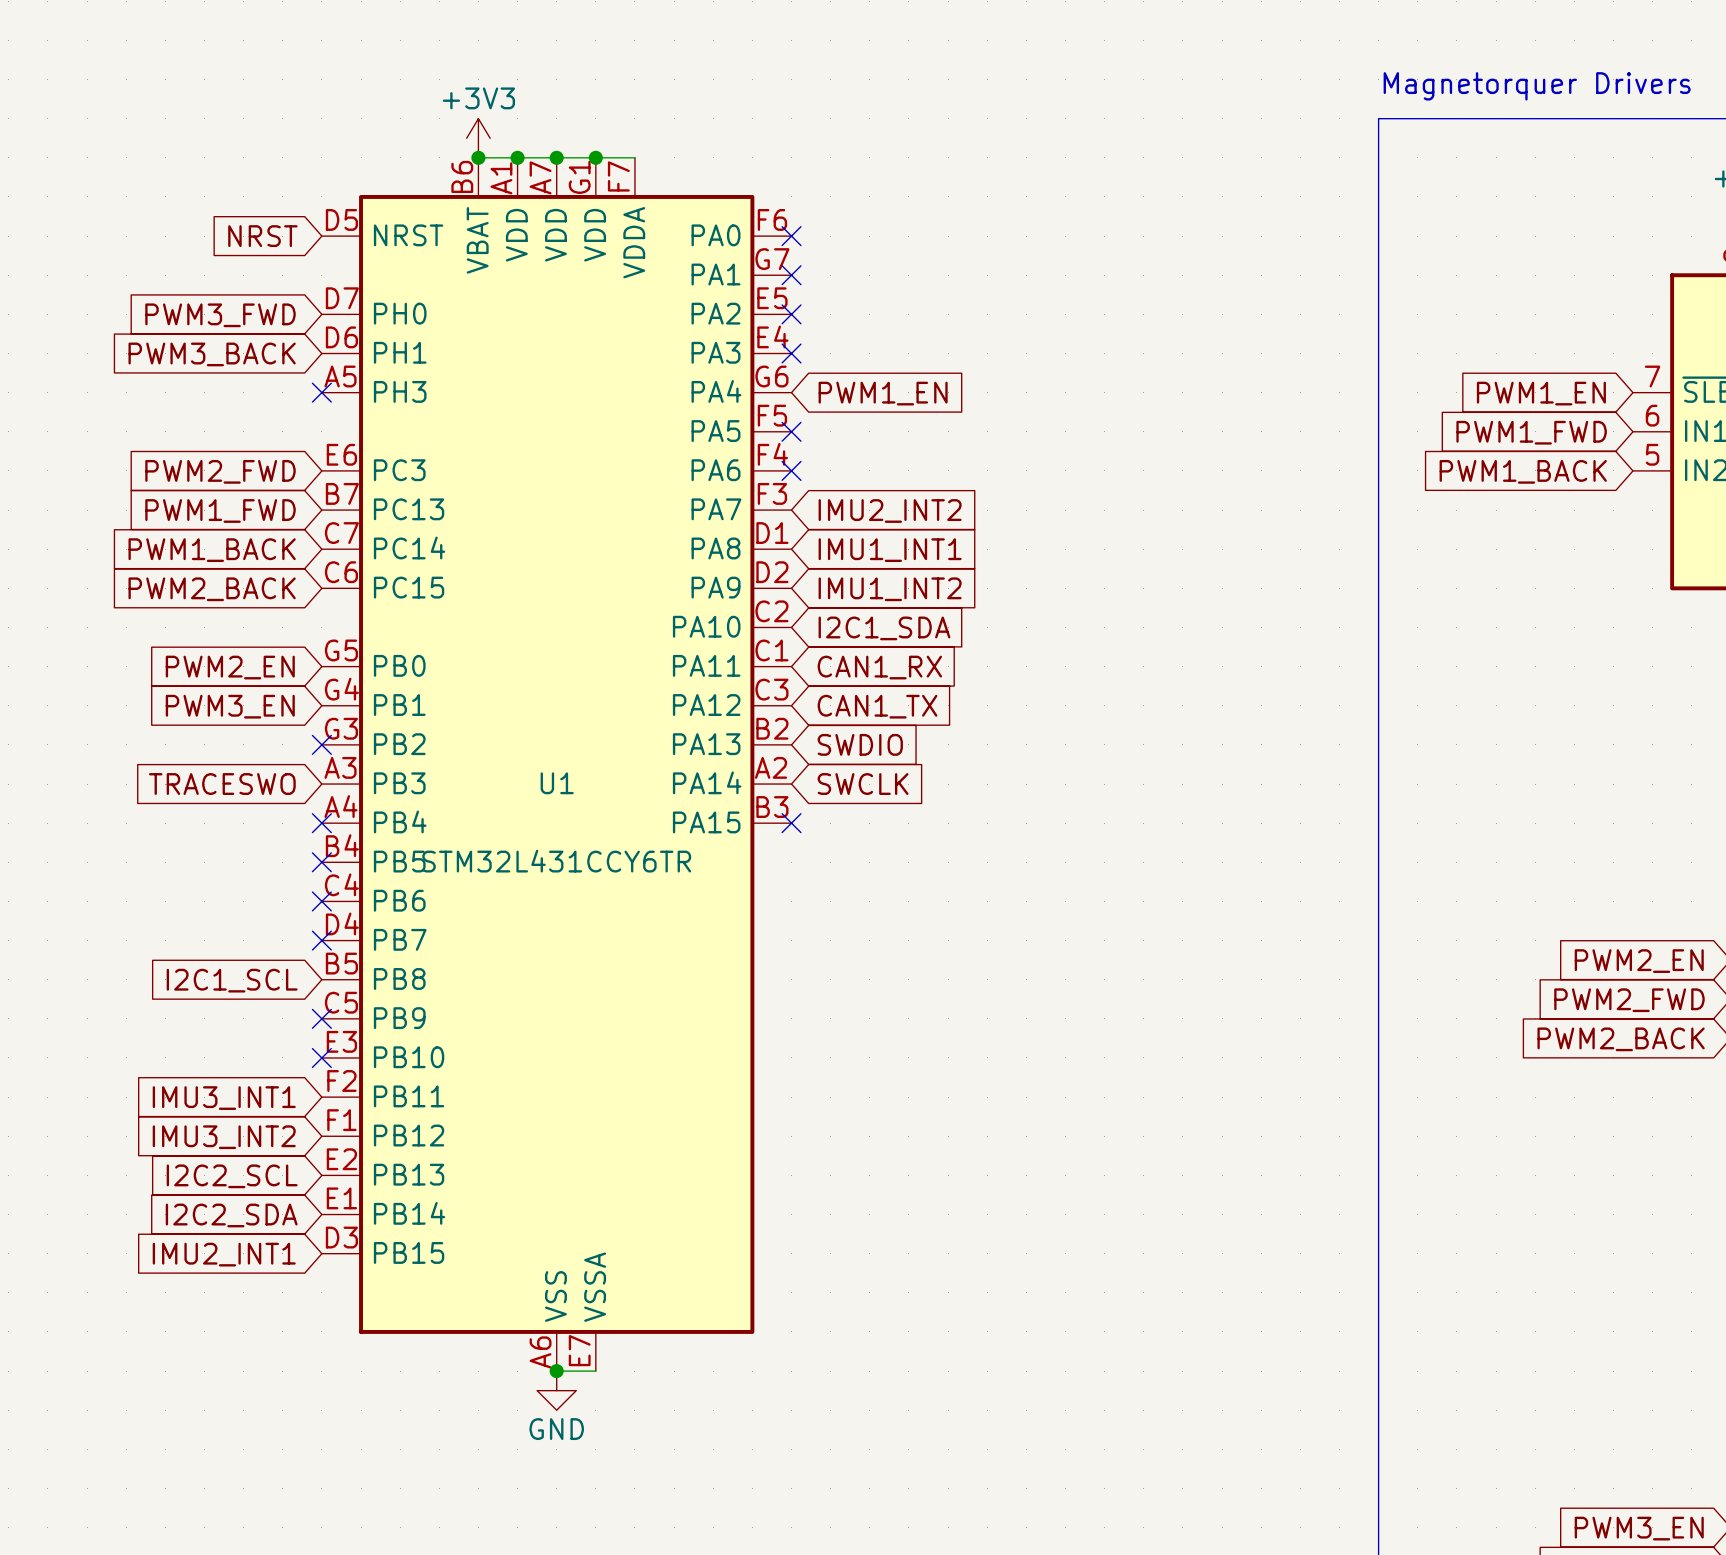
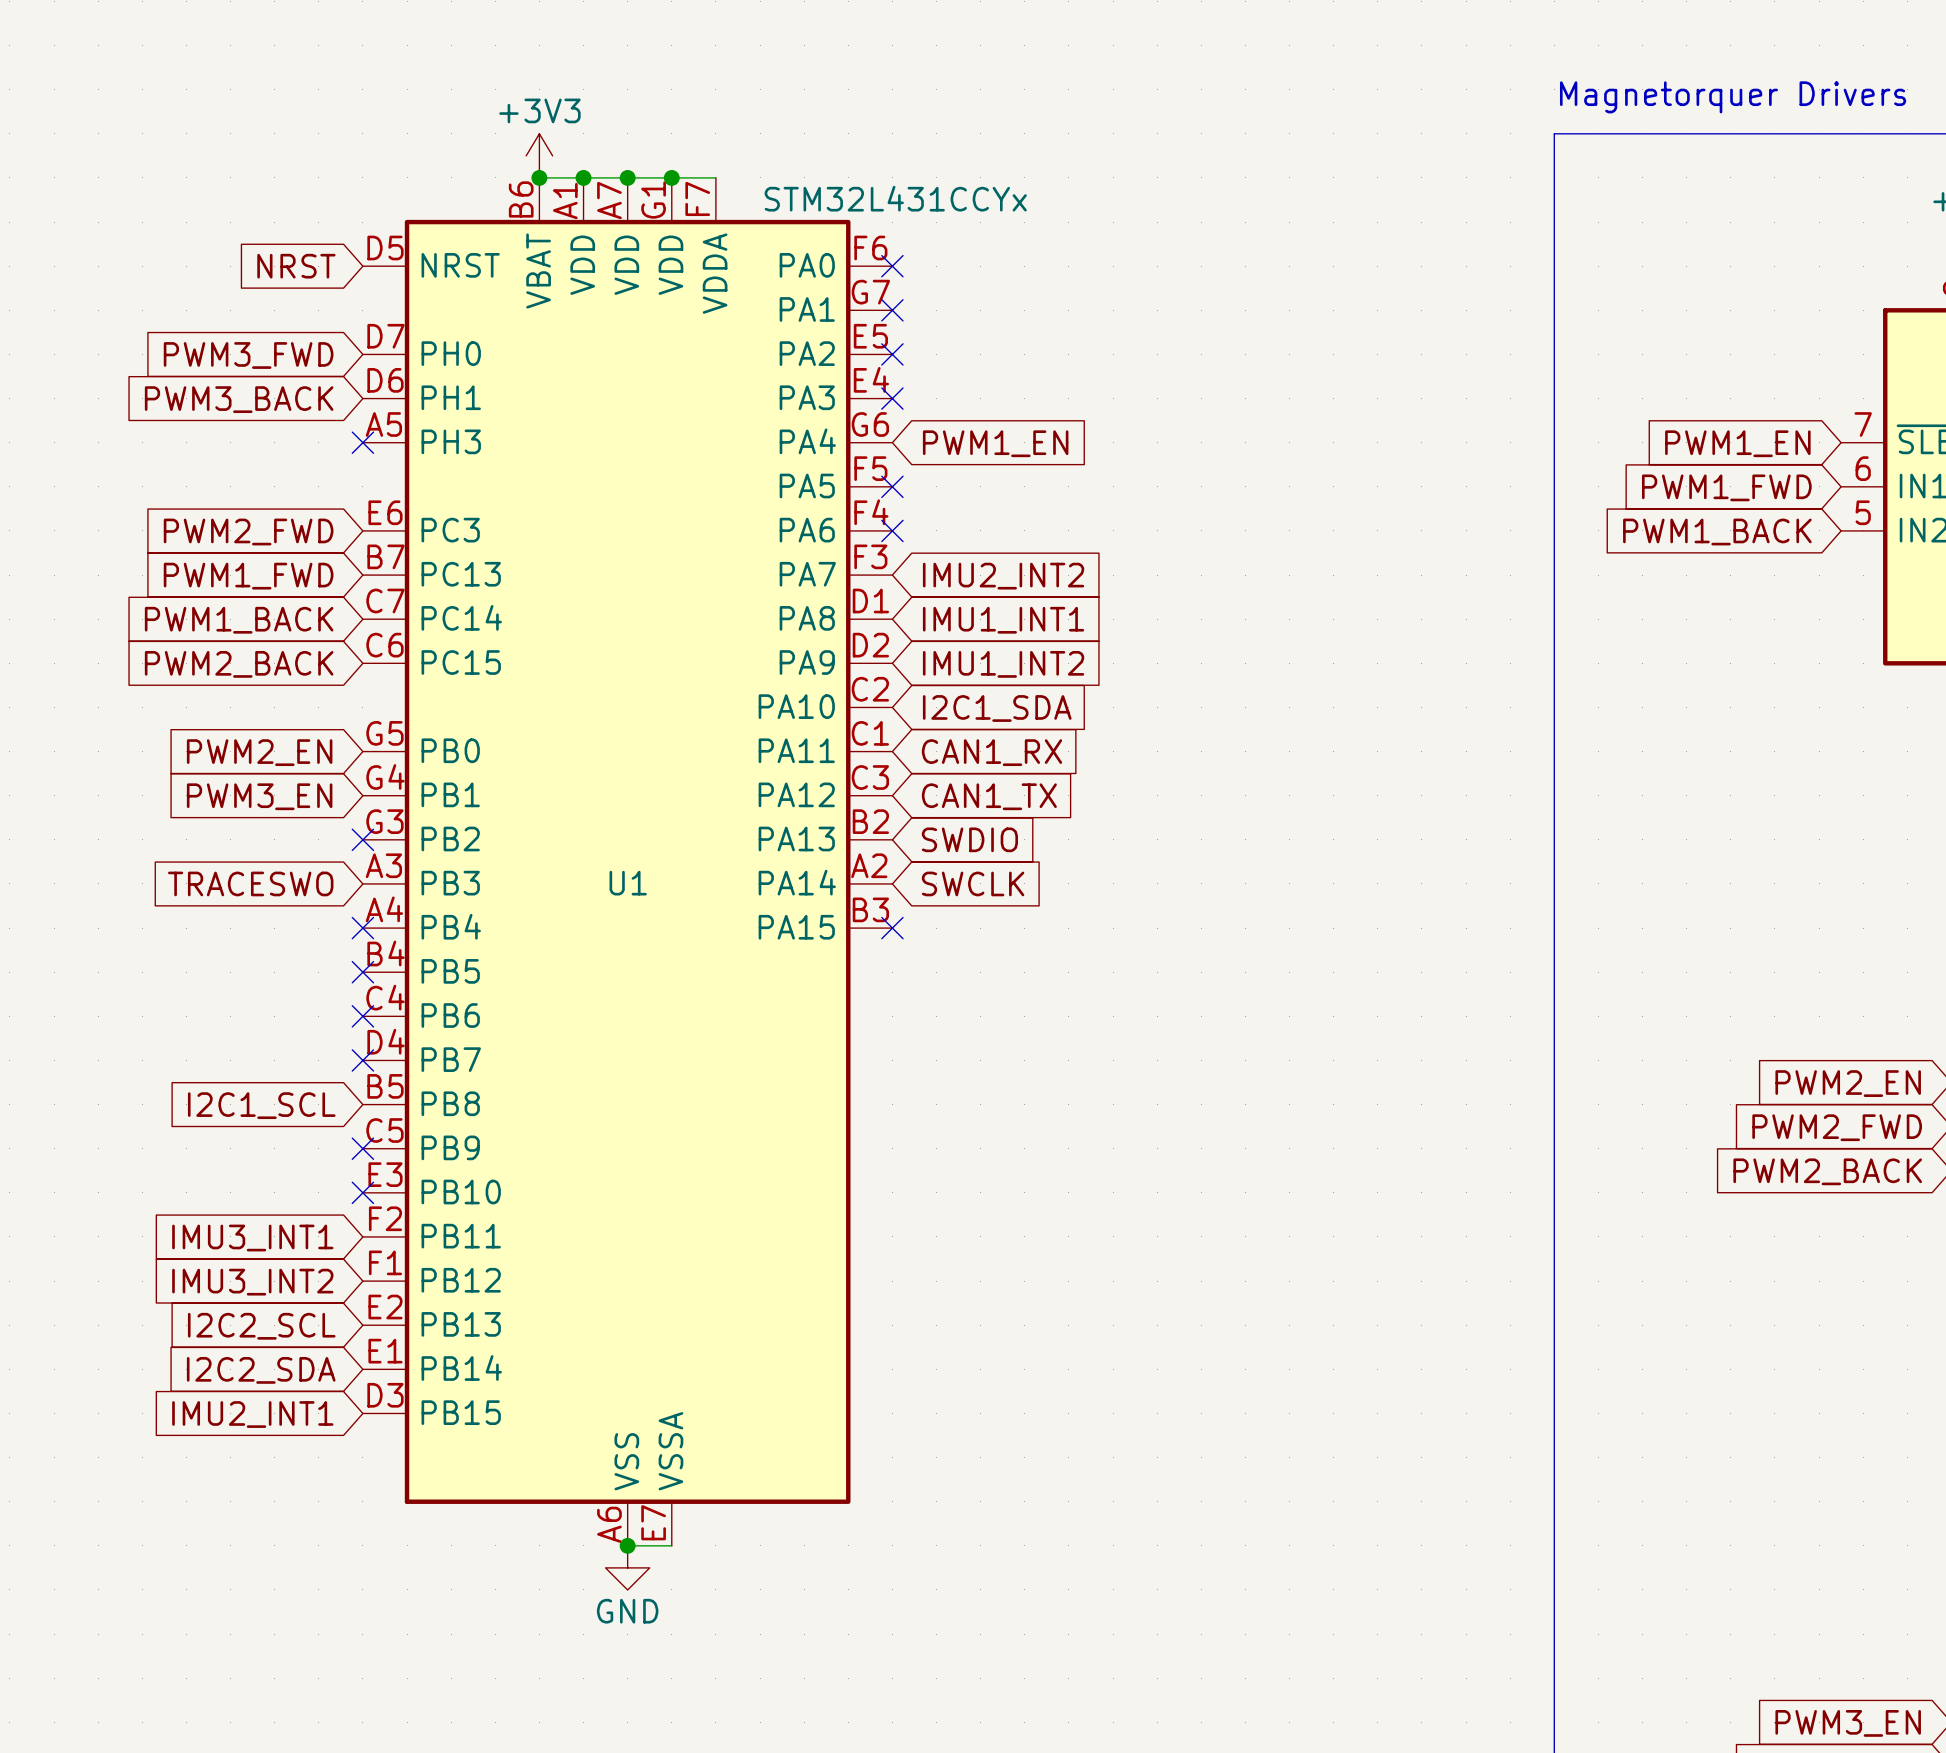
U1 value: STM32L431CCY6TR (556, 861) -> STM32L431CCYx (895, 198)

